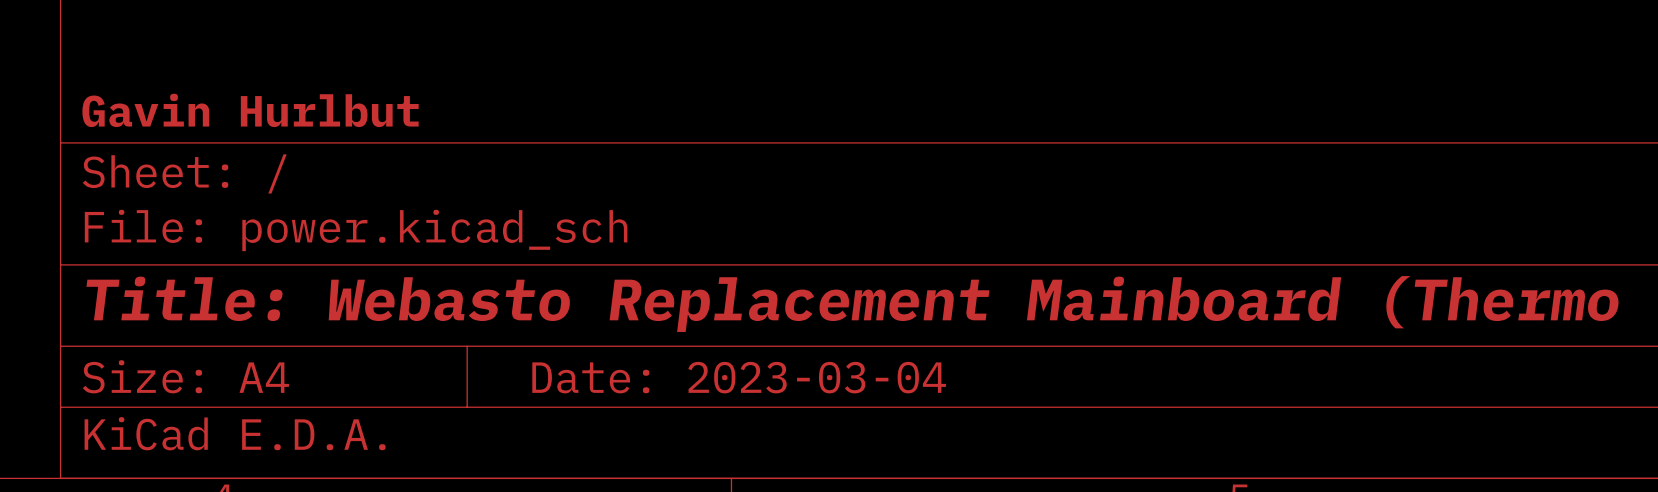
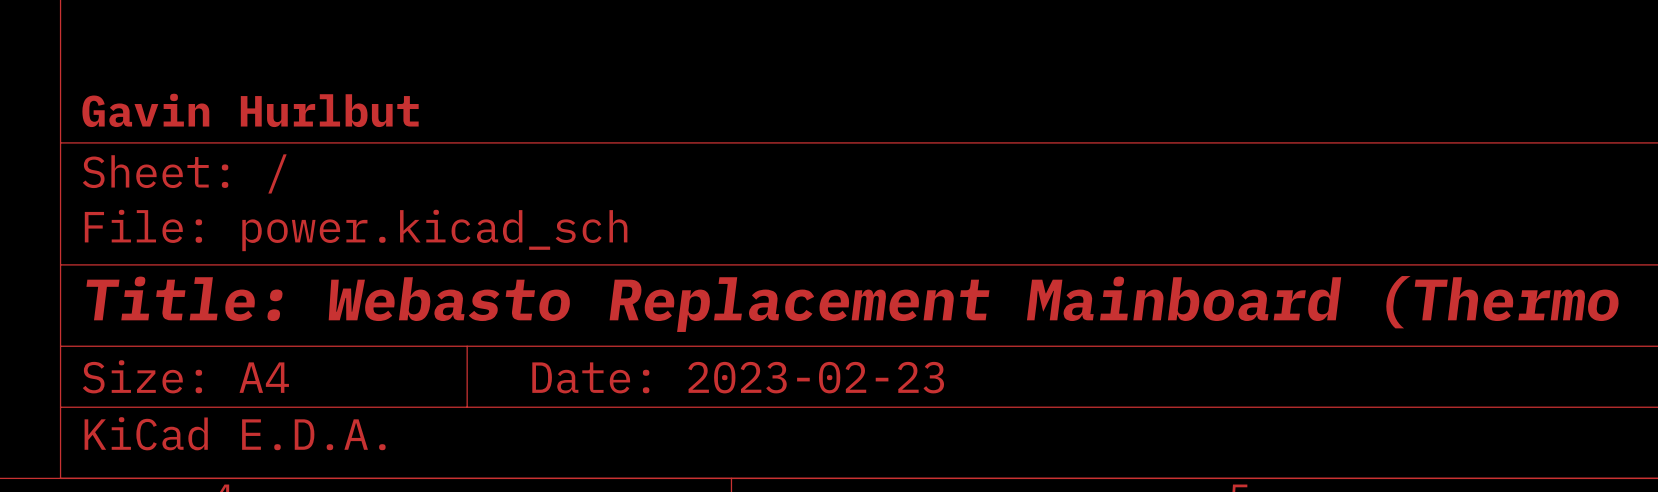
title block: Date: 2023-03-04 (739, 377) -> Date: 2023-02-23 (738, 377)

